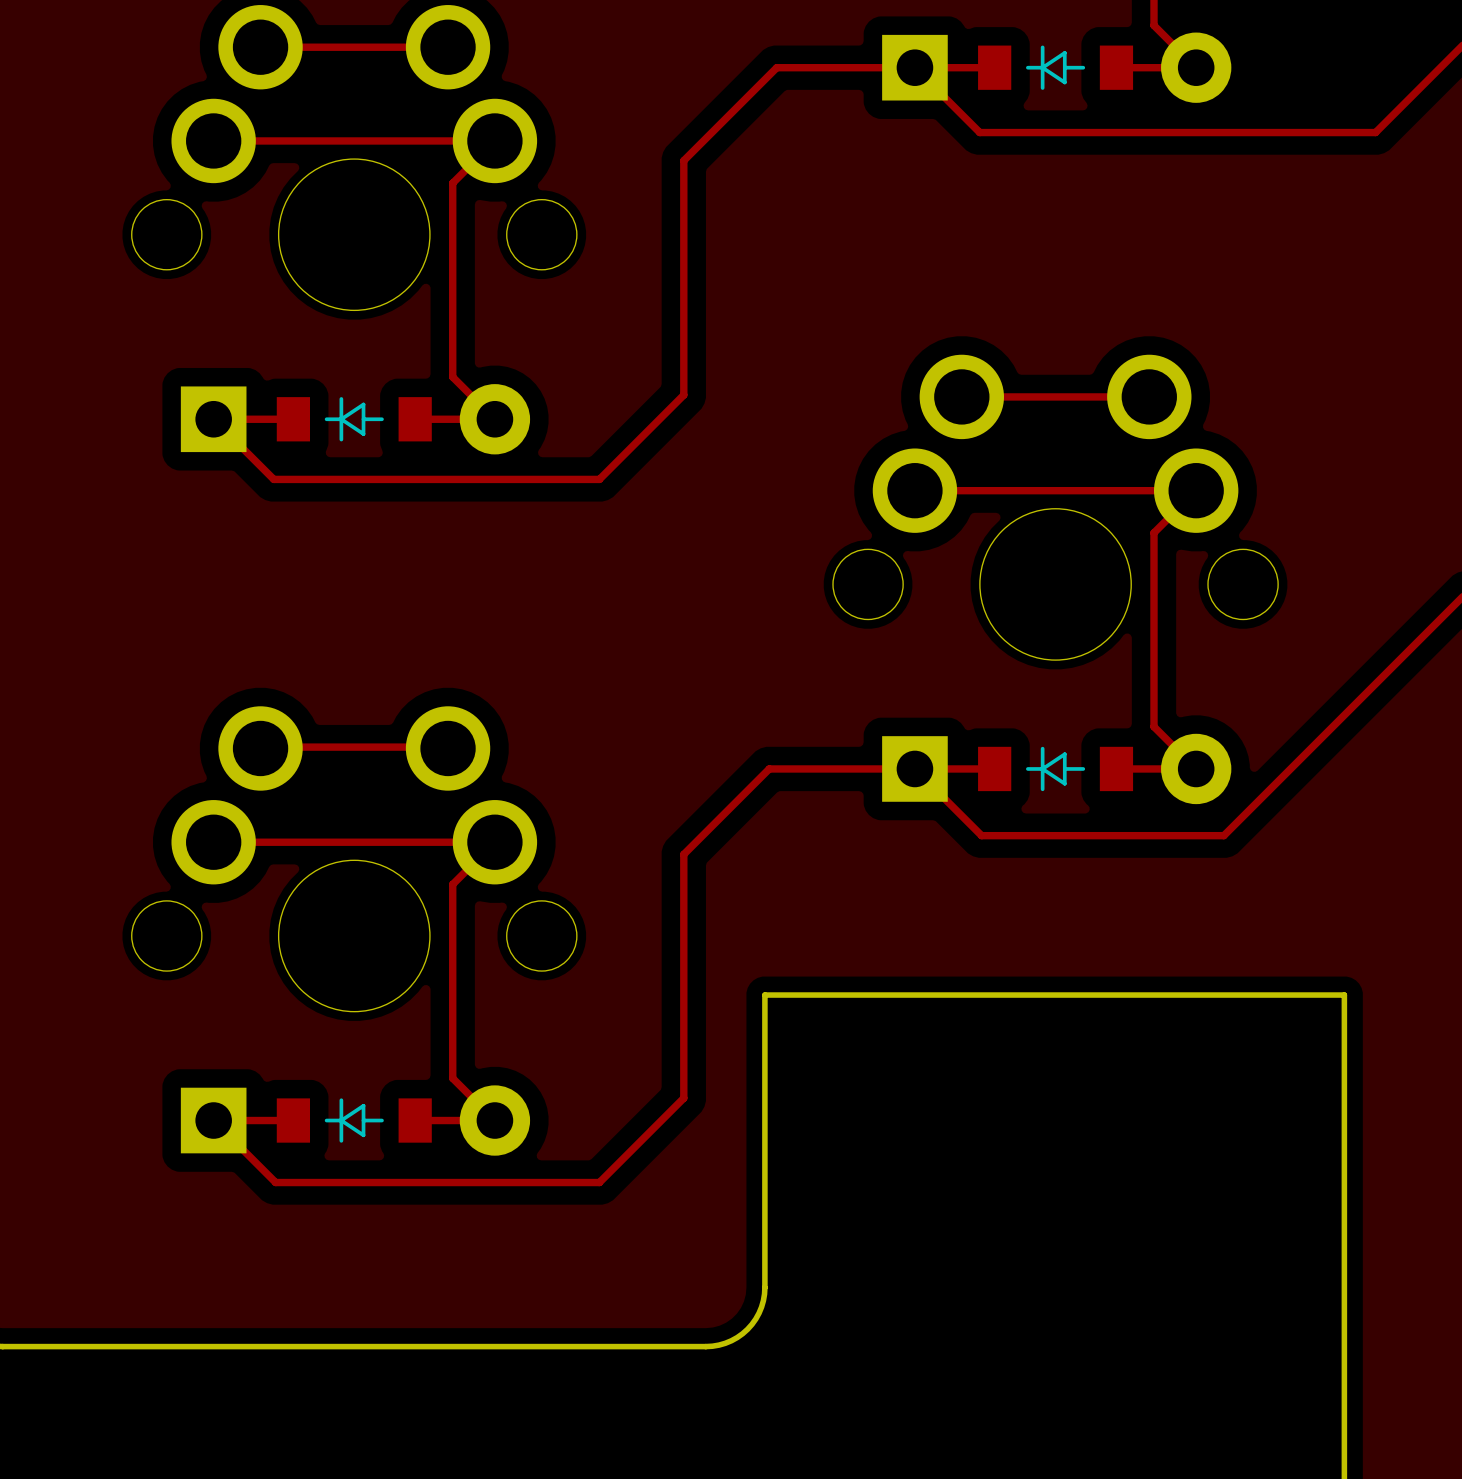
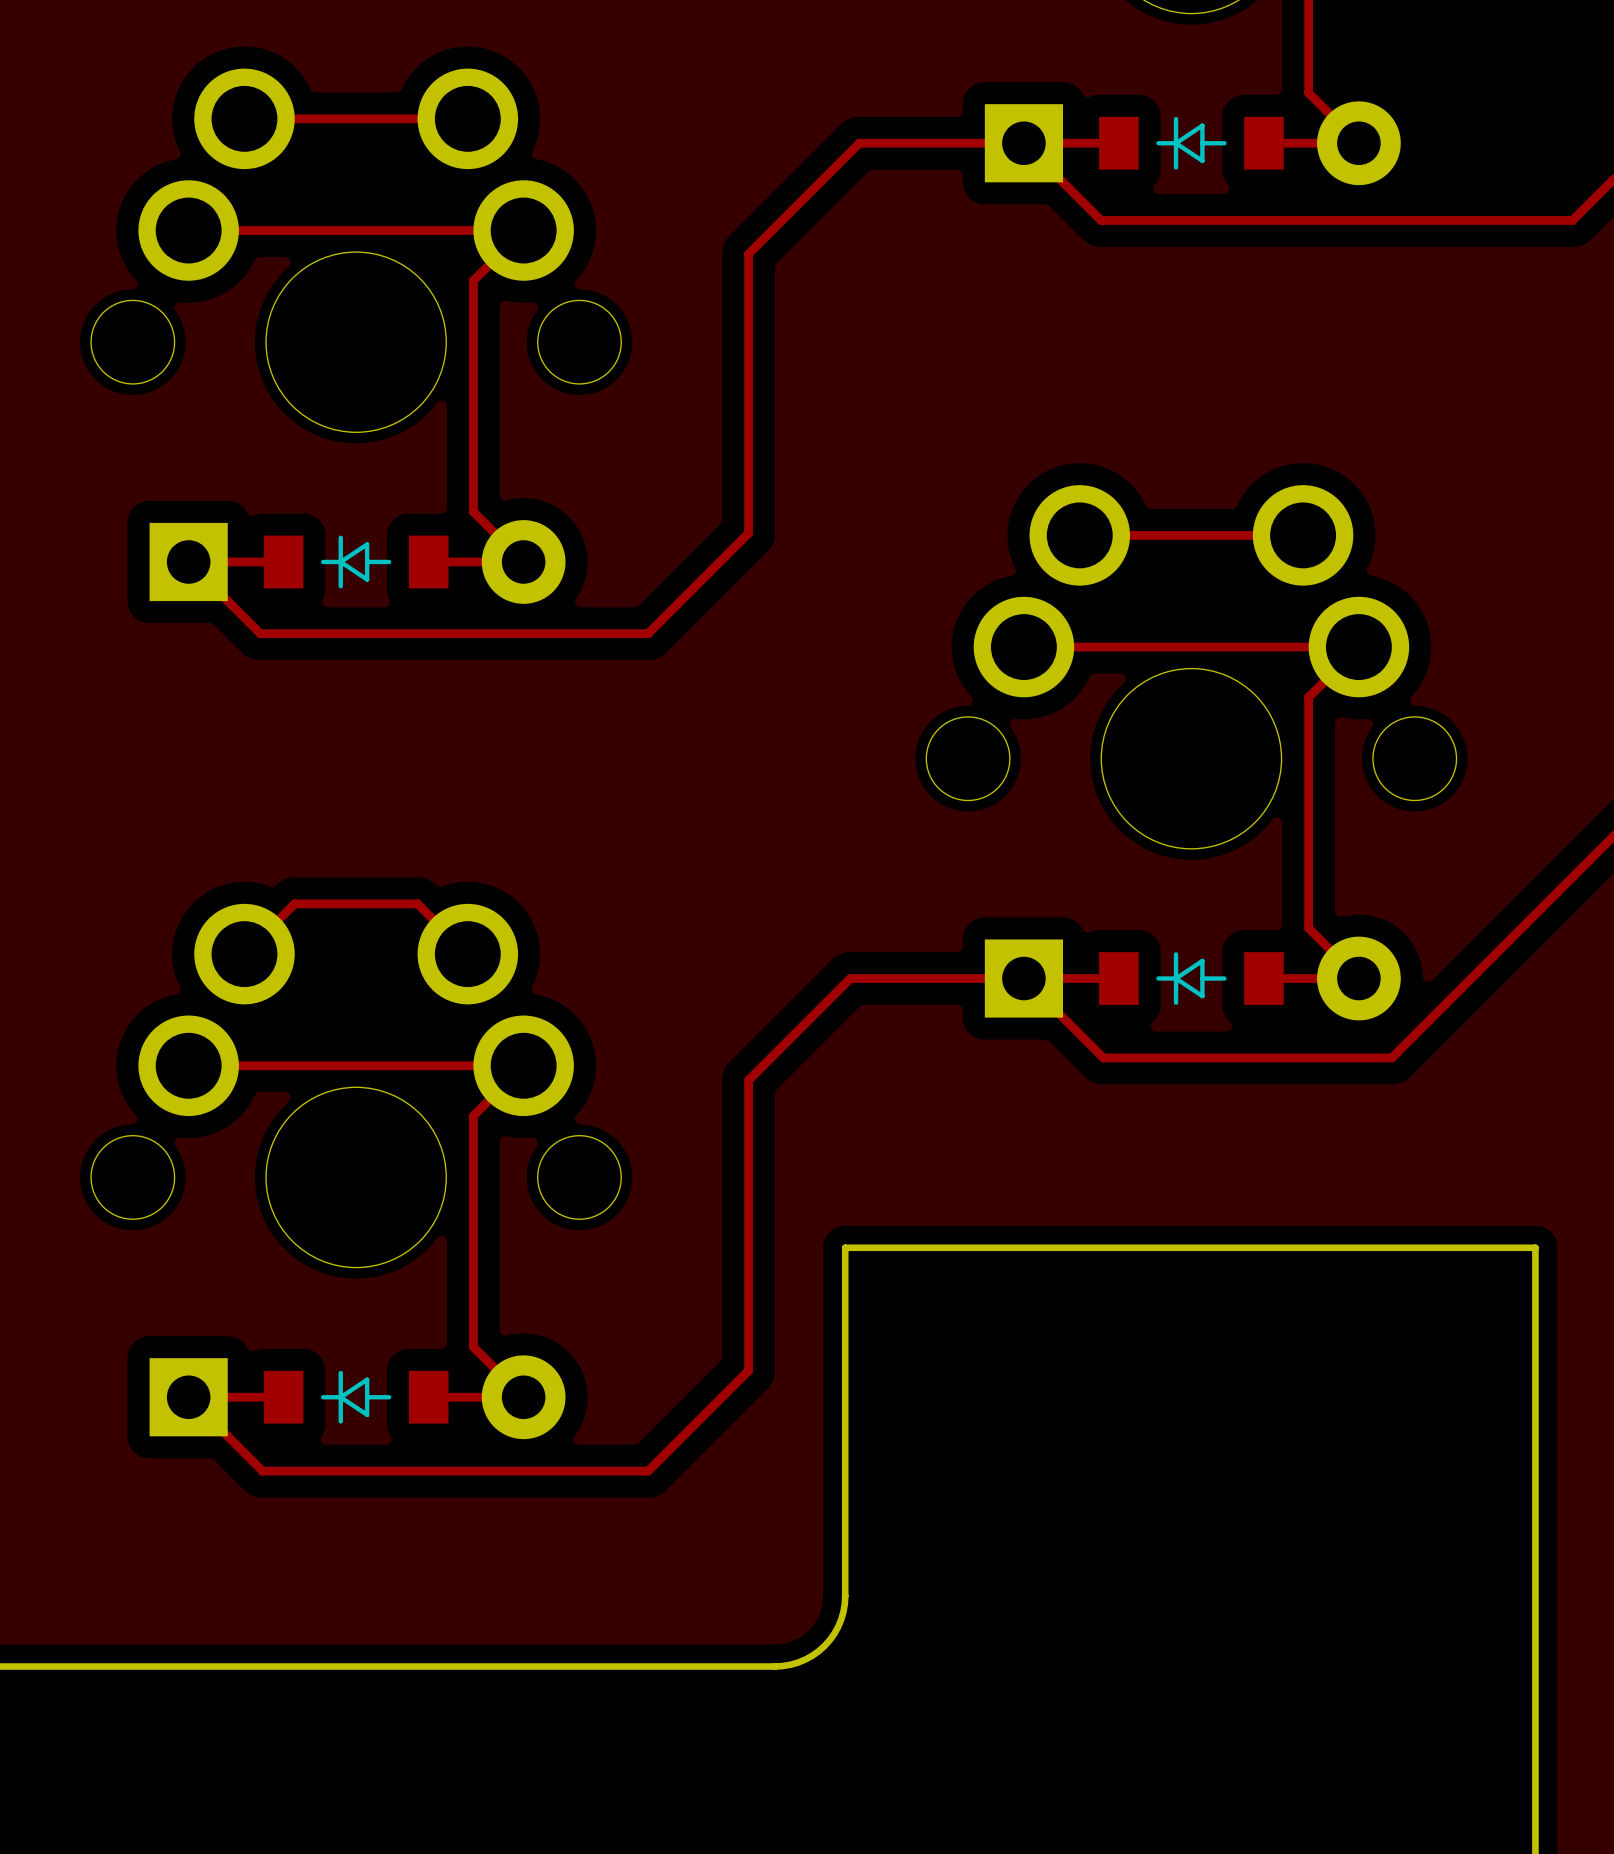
track: (261, 747) (446, 747) -> (246, 952) (294, 903) (417, 903) (466, 952)

